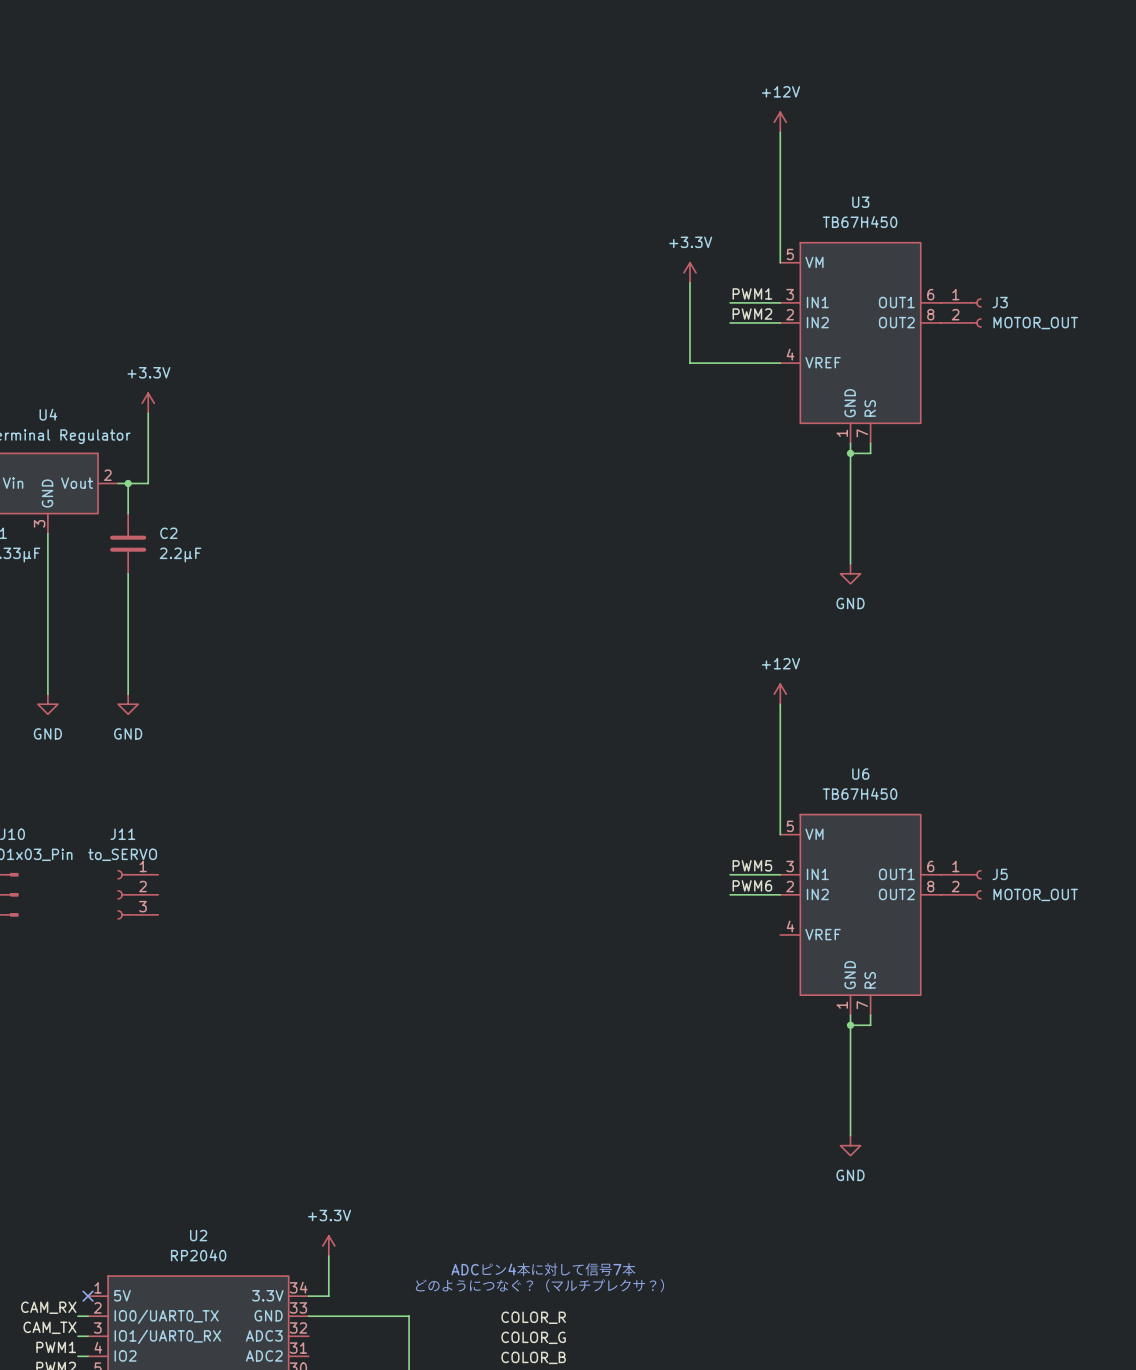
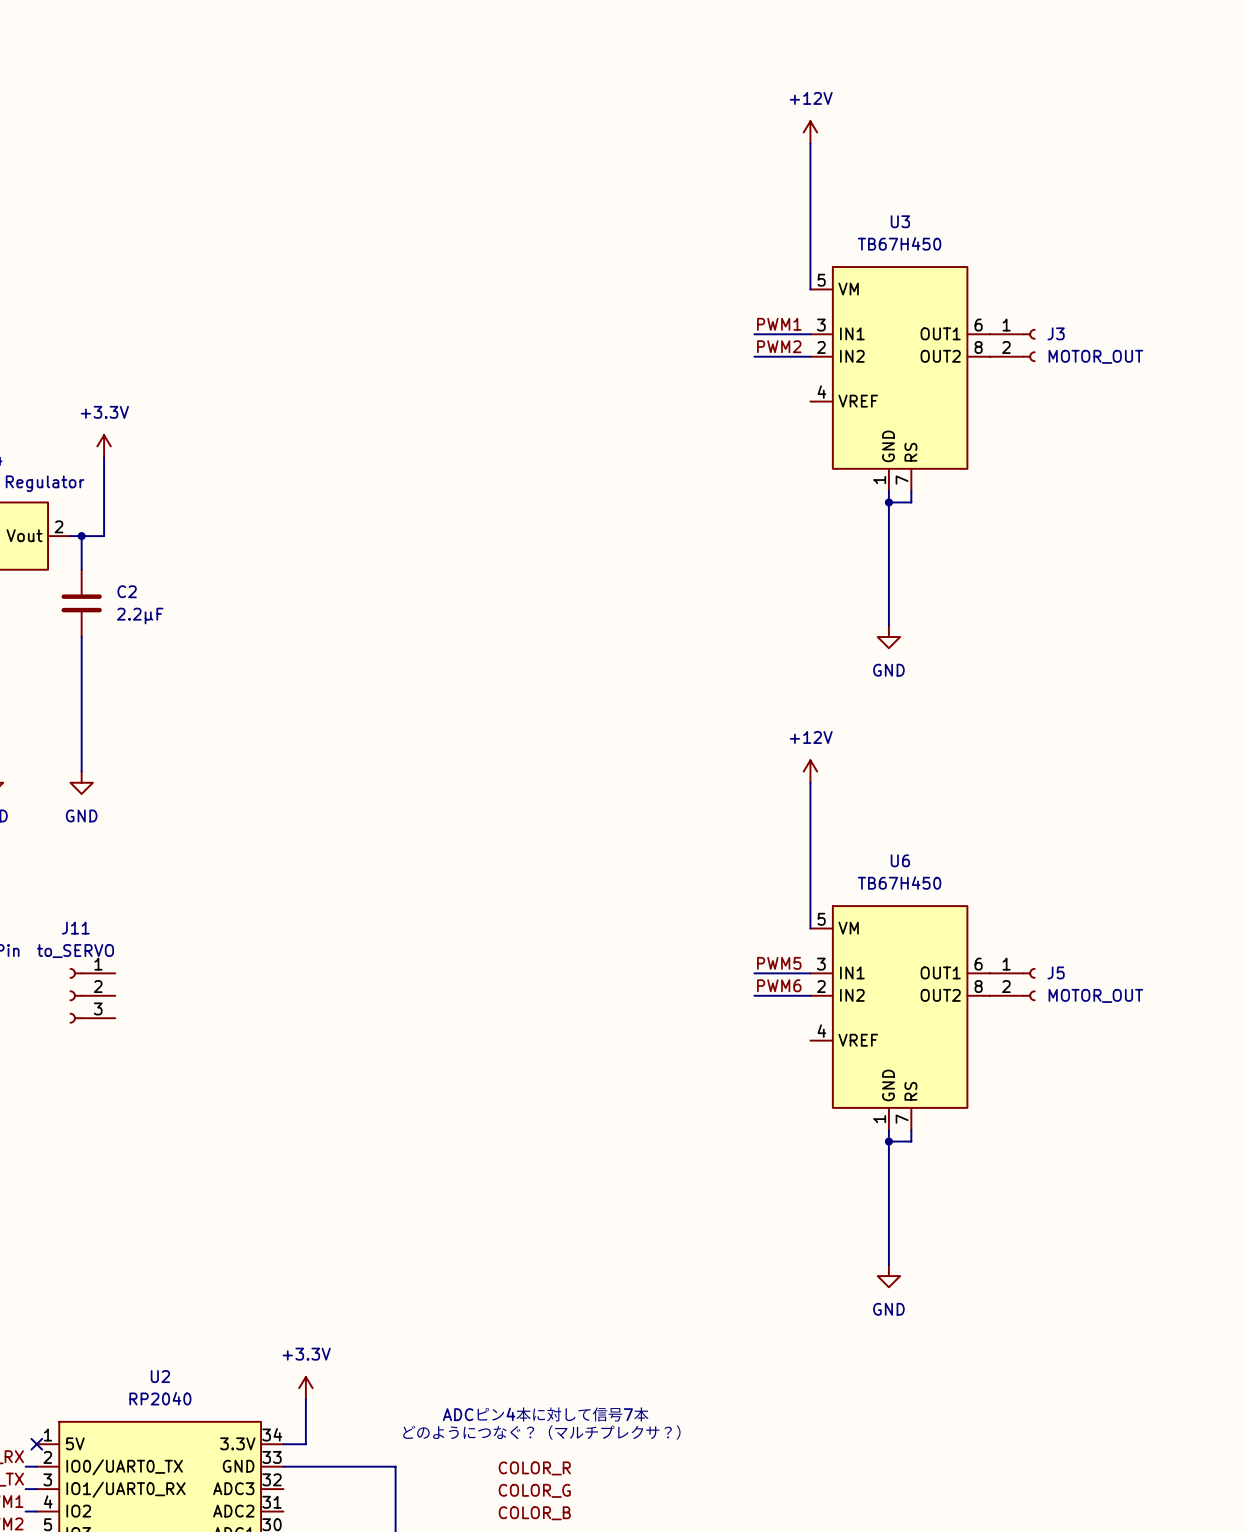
power symbol: +3.3V (689, 272) -> none
wire: (689, 282) (689, 363) (780, 363) -> none

